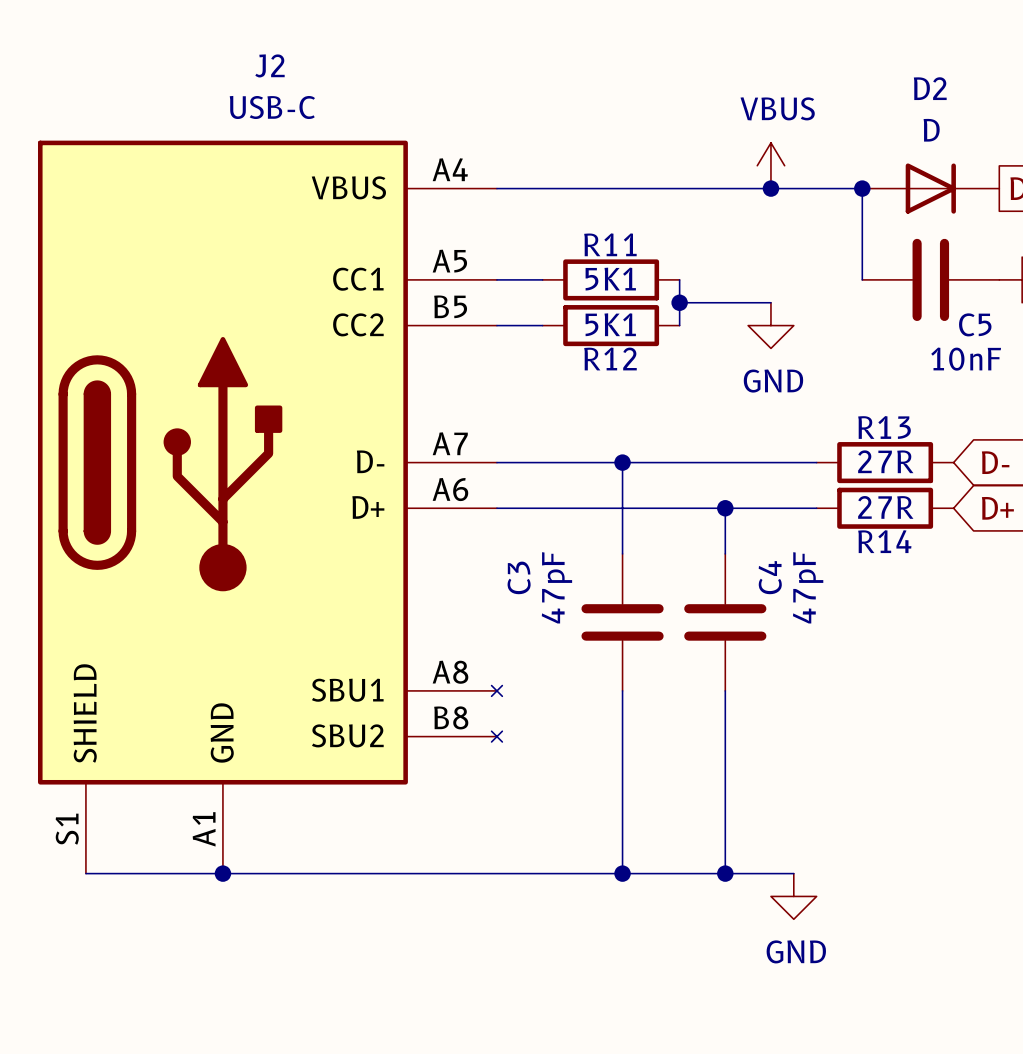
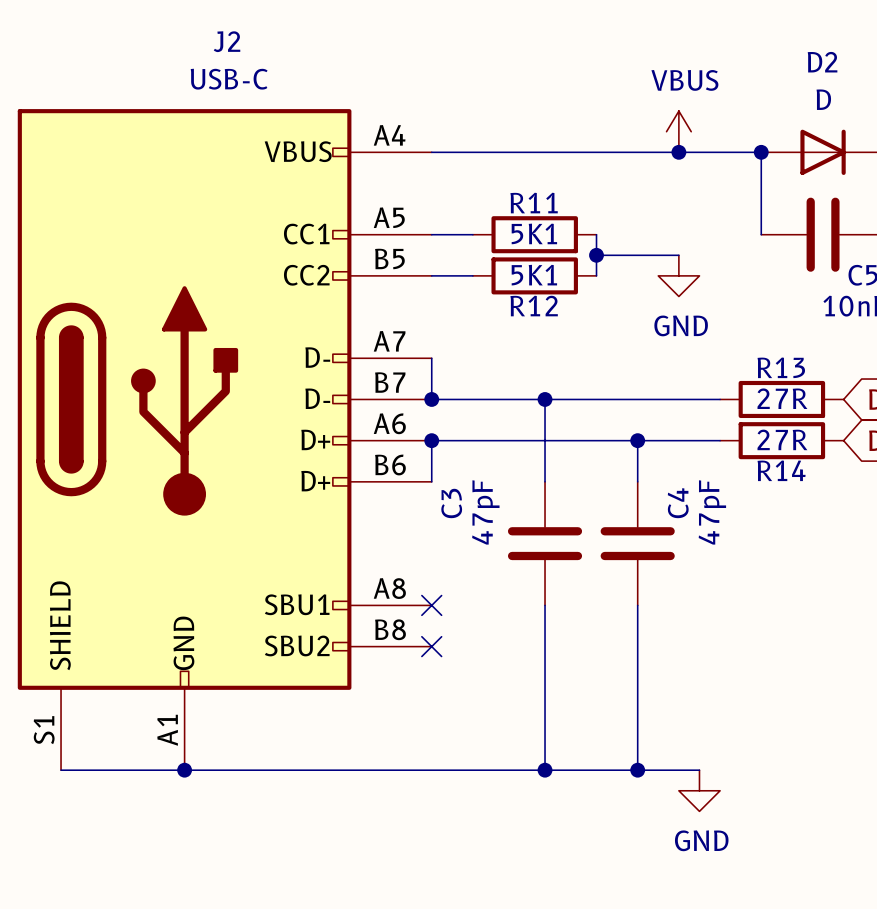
J2 symbol: [37, 140, 503, 874] -> [17, 109, 432, 771]
wire: none -> (431, 358) (431, 399)
junction: none -> (431, 399)
wire: none -> (431, 440) (431, 481)
junction: none -> (431, 440)
no-connect mark: none -> (431, 605)
no-connect mark: none -> (431, 646)

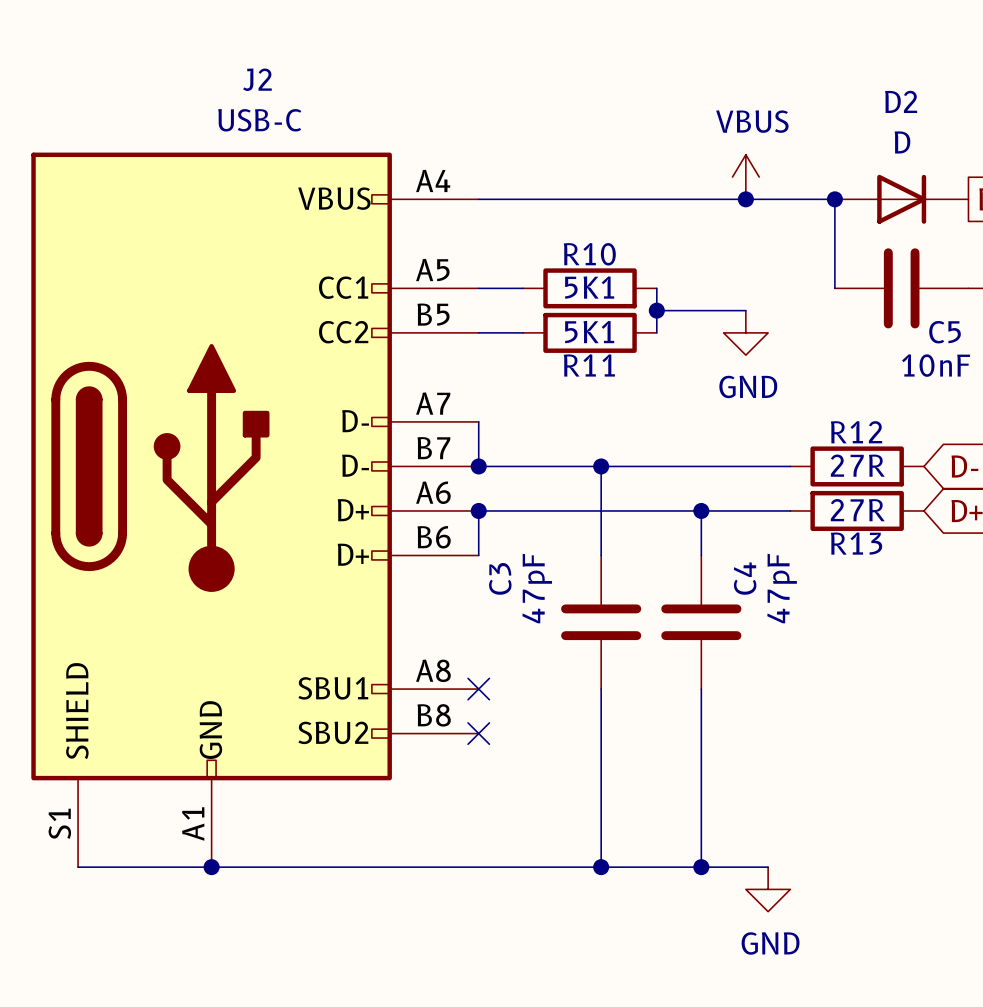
R11 name: R11 (534, 203) -> R10 (589, 254)
R12 name: R12 (534, 306) -> R11 (589, 365)
R13 name: R13 (781, 367) -> R12 (856, 432)
R14 name: R14 (781, 470) -> R13 (856, 543)

